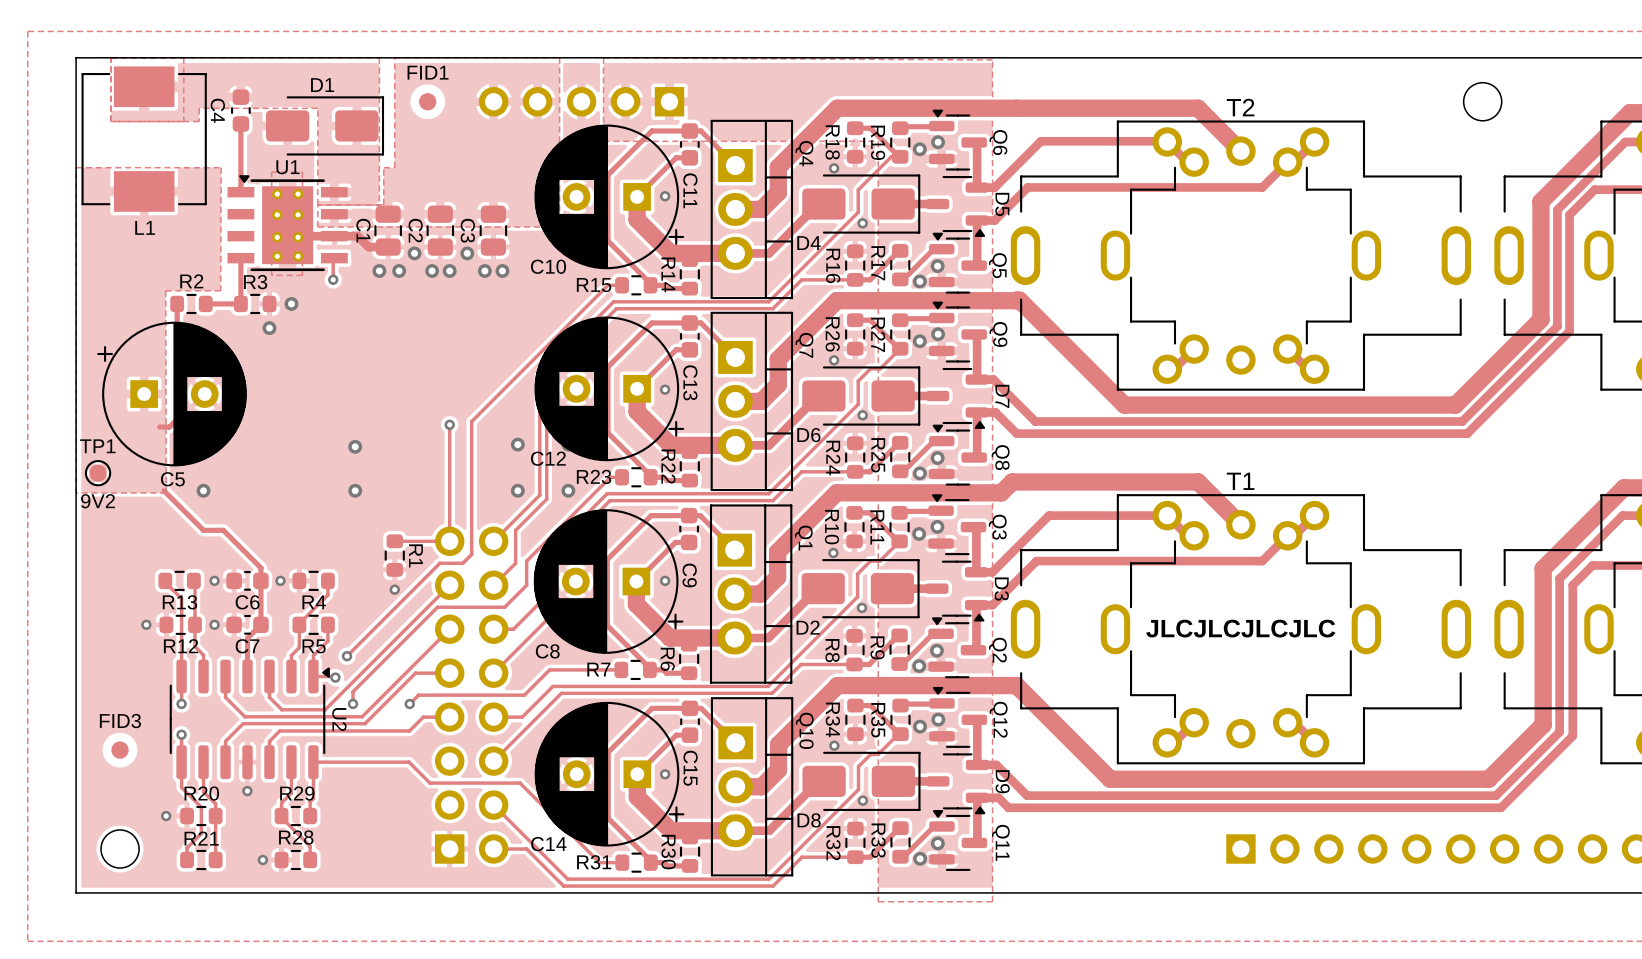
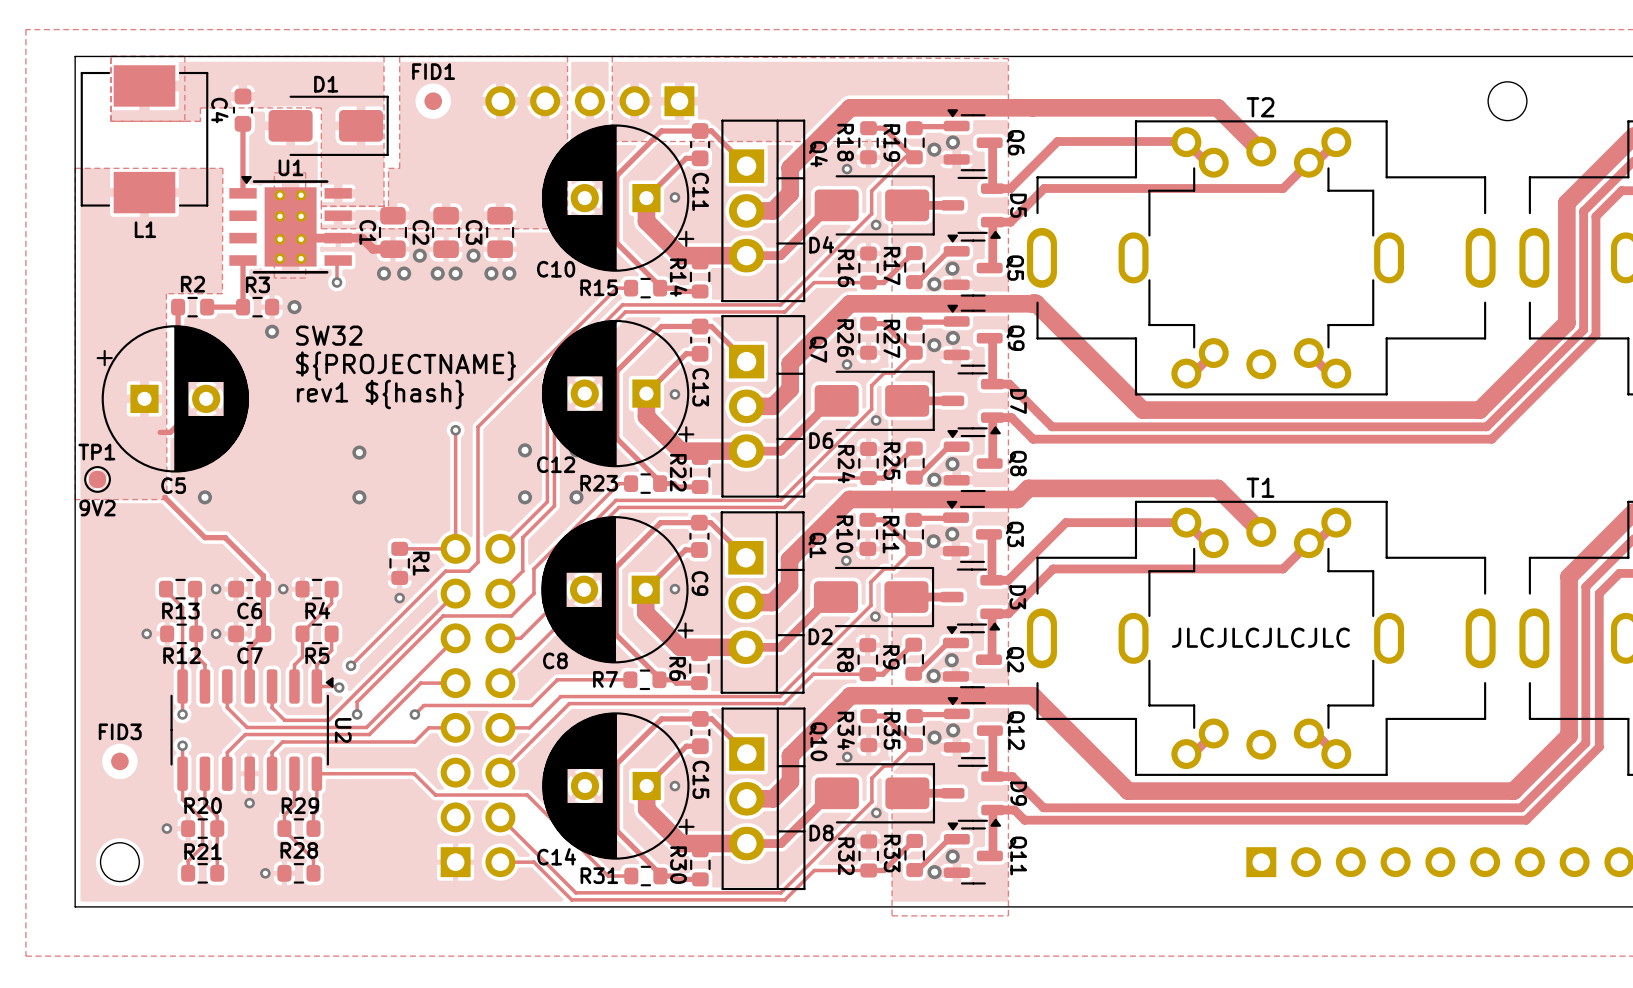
text: none -> SW32 (329, 335)
text: none -> ${PROJECTNAME} (406, 366)
text: none -> rev1 ${hash} (380, 394)

